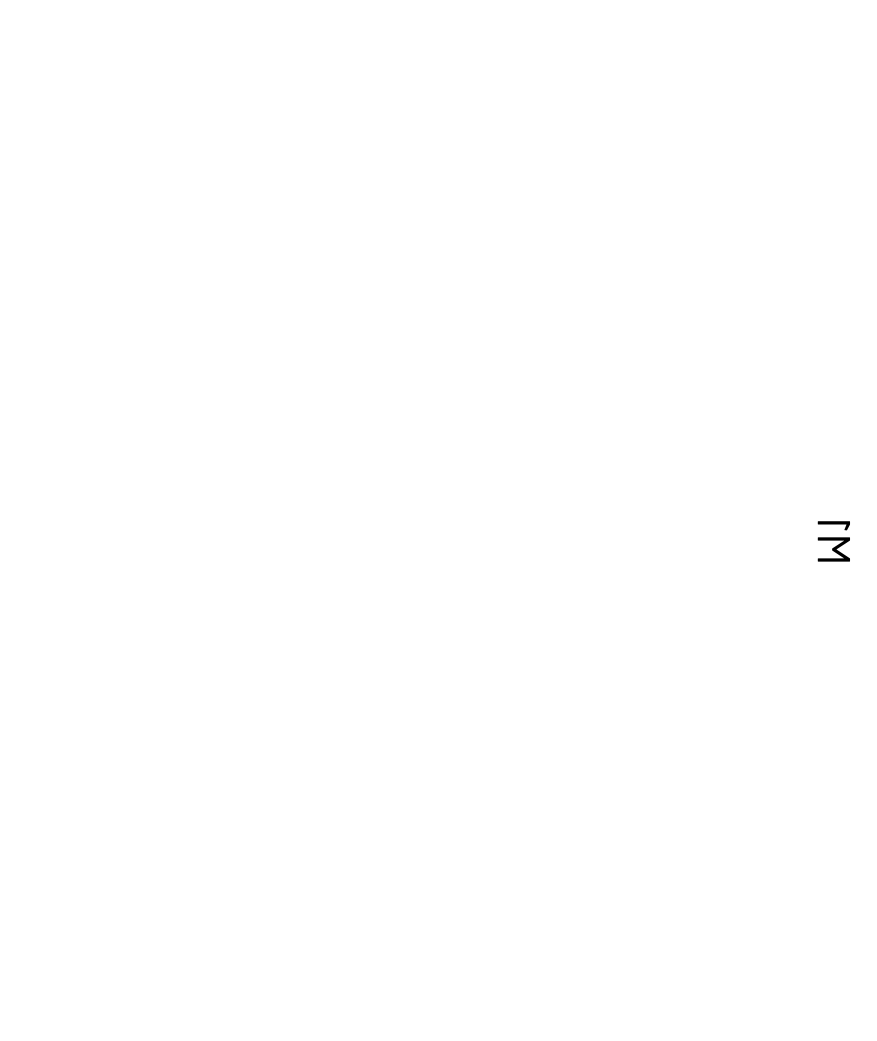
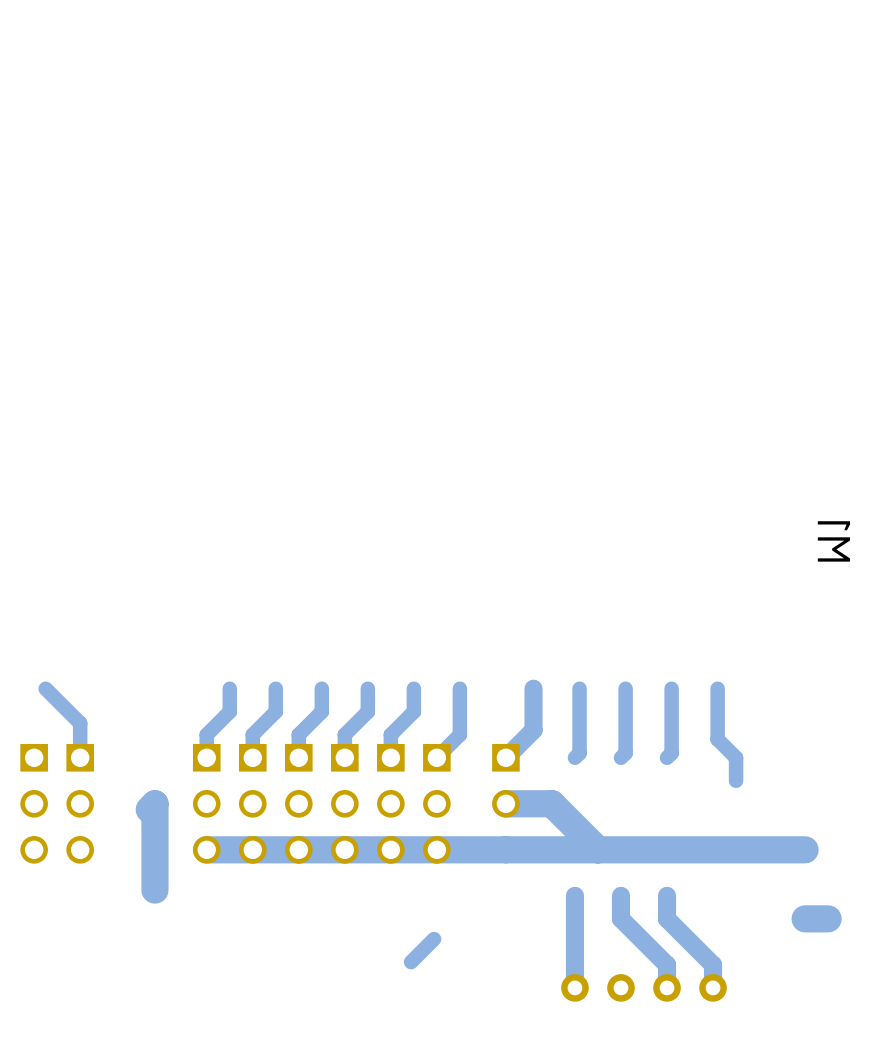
bottom track: none -> (45, 688) (80, 723) (80, 757)
bottom track: none -> (229, 688) (229, 711) (206, 734) (206, 757)
bottom track: none -> (275, 688) (275, 711) (252, 734) (252, 757)
bottom track: none -> (321, 688) (321, 711) (298, 734) (298, 757)
bottom track: none -> (367, 688) (367, 711) (344, 734) (344, 757)
bottom track: none -> (413, 688) (413, 711) (390, 734) (390, 757)
bottom track: none -> (459, 688) (459, 734) (436, 757)
bottom track: none -> (533, 688) (533, 730) (505, 757)
bottom track: none -> (579, 688) (579, 753) (574, 757)
bottom track: none -> (625, 688) (625, 753) (620, 757)
bottom track: none -> (671, 688) (671, 753) (667, 757)
bottom track: none -> (717, 688) (717, 739) (736, 757) (736, 780)
part: none -> (505, 780)
part: none -> (34, 803)
part: none -> (80, 803)
part: none -> (206, 803)
part: none -> (252, 803)
part: none -> (298, 803)
part: none -> (344, 803)
part: none -> (390, 803)
part: none -> (436, 803)
bottom track: none -> (505, 803) (551, 803) (597, 849)
bottom track: none -> (149, 809) (154, 803) (154, 890)
bottom track: none -> (805, 849) (206, 849)
bottom track: none -> (574, 895) (574, 987)
bottom track: none -> (620, 895) (620, 918) (667, 964) (667, 987)
bottom track: none -> (667, 895) (667, 918) (713, 964) (713, 987)
bottom track: none -> (828, 918) (805, 918)
bottom track: none -> (434, 939) (411, 962)
part: none -> (644, 987)

